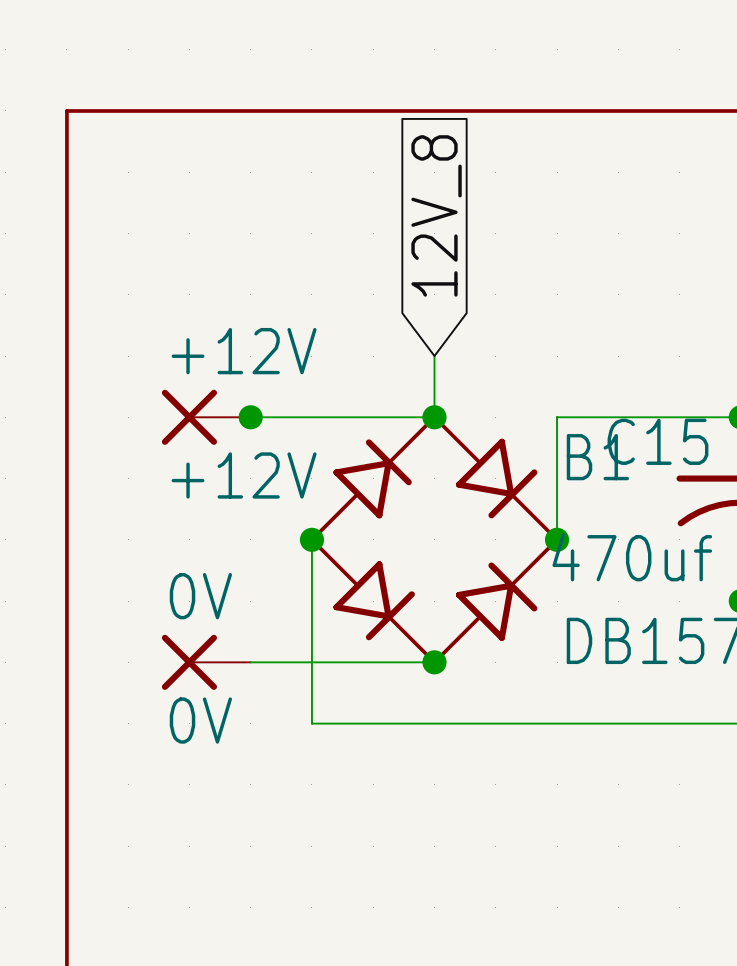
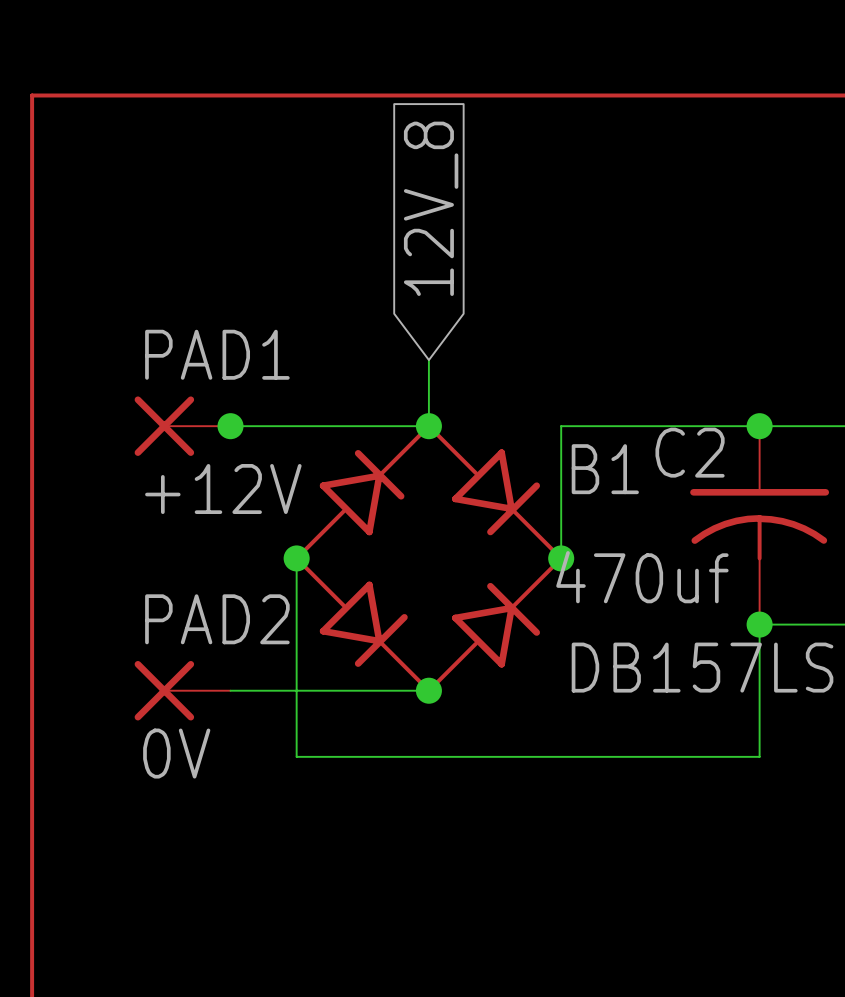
+12V name: +12V (244, 351) -> PAD1 (217, 354)
C15 name: C15 (657, 441) -> C2 (690, 452)
0V name: 0V (200, 596) -> PAD2 (217, 619)

